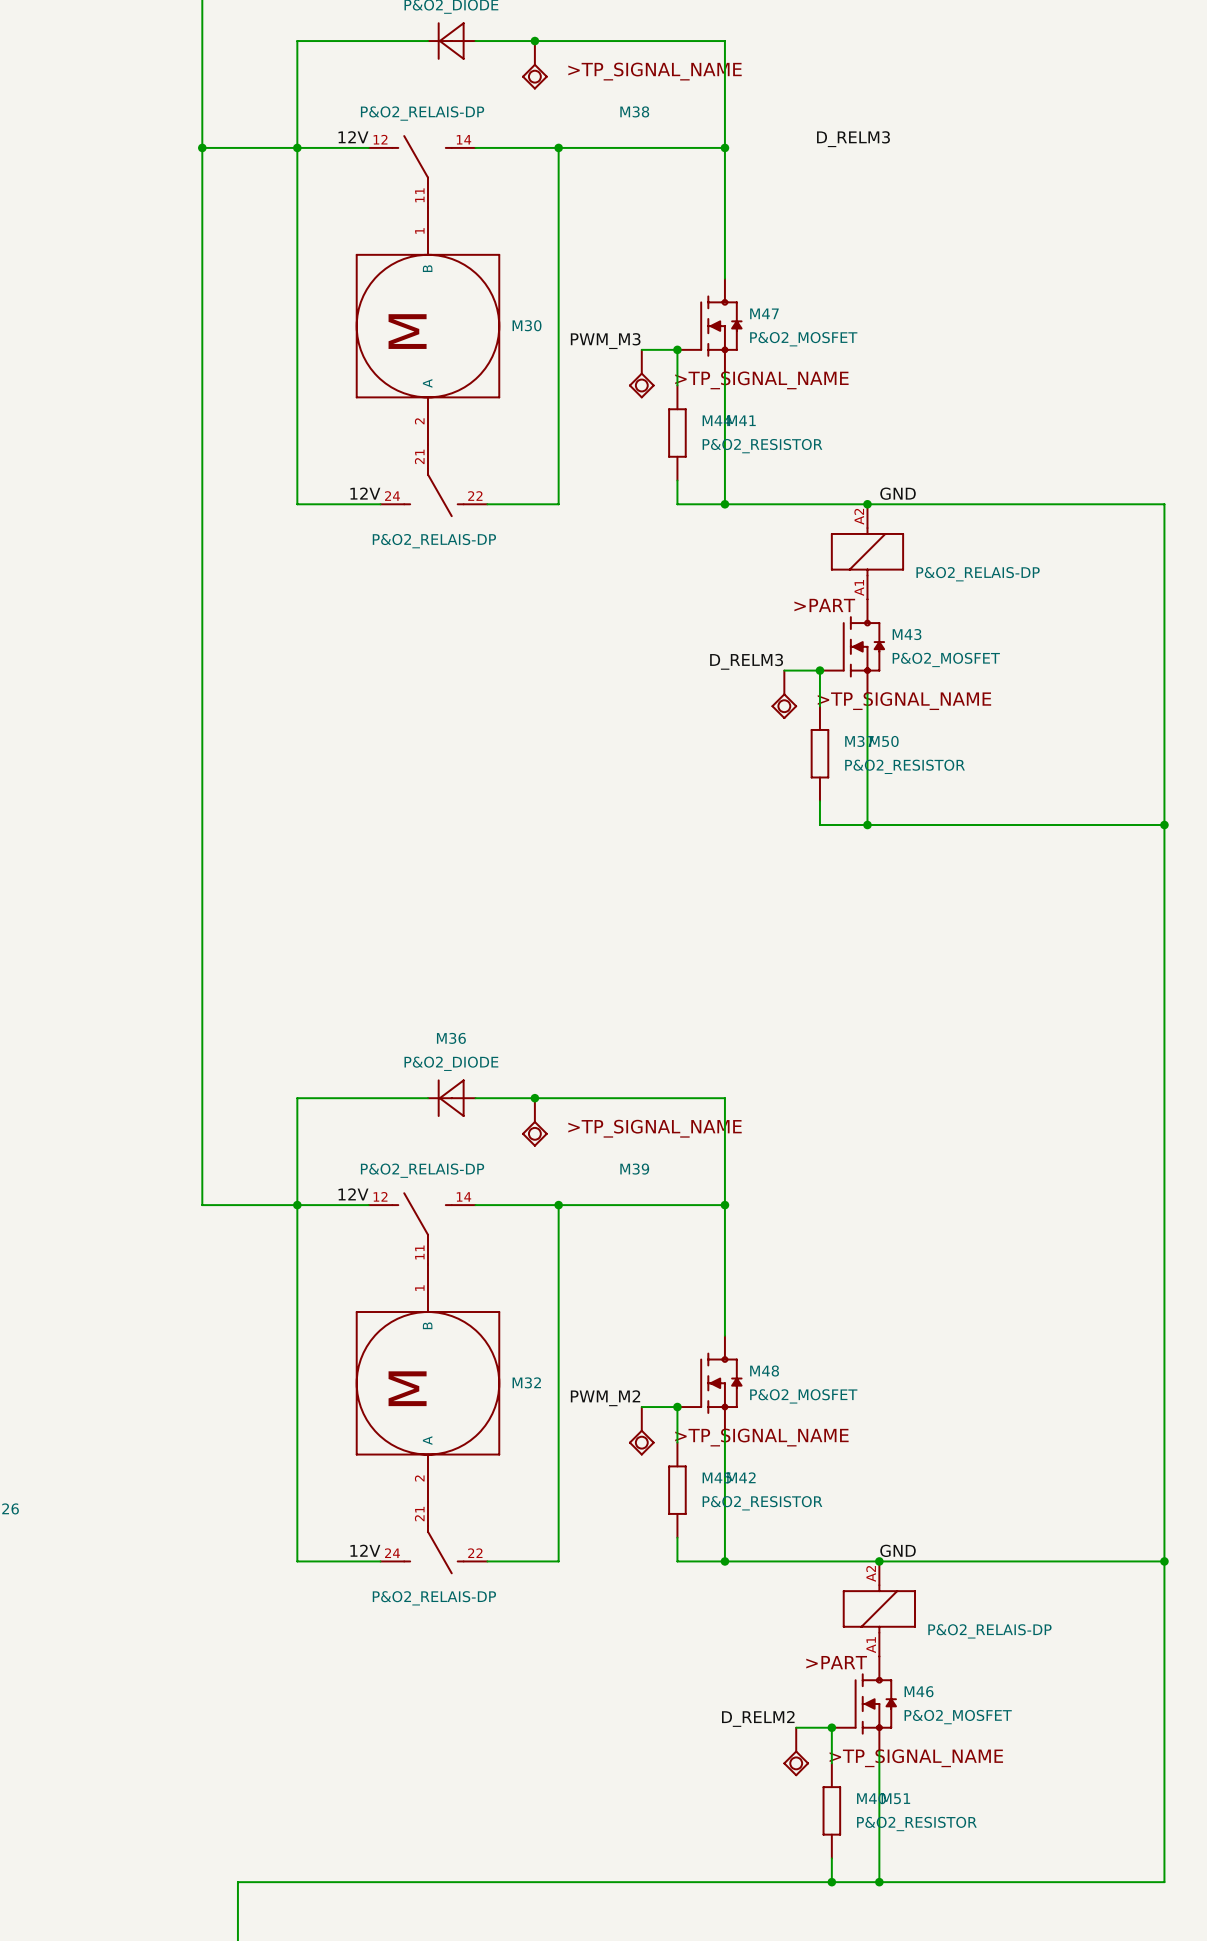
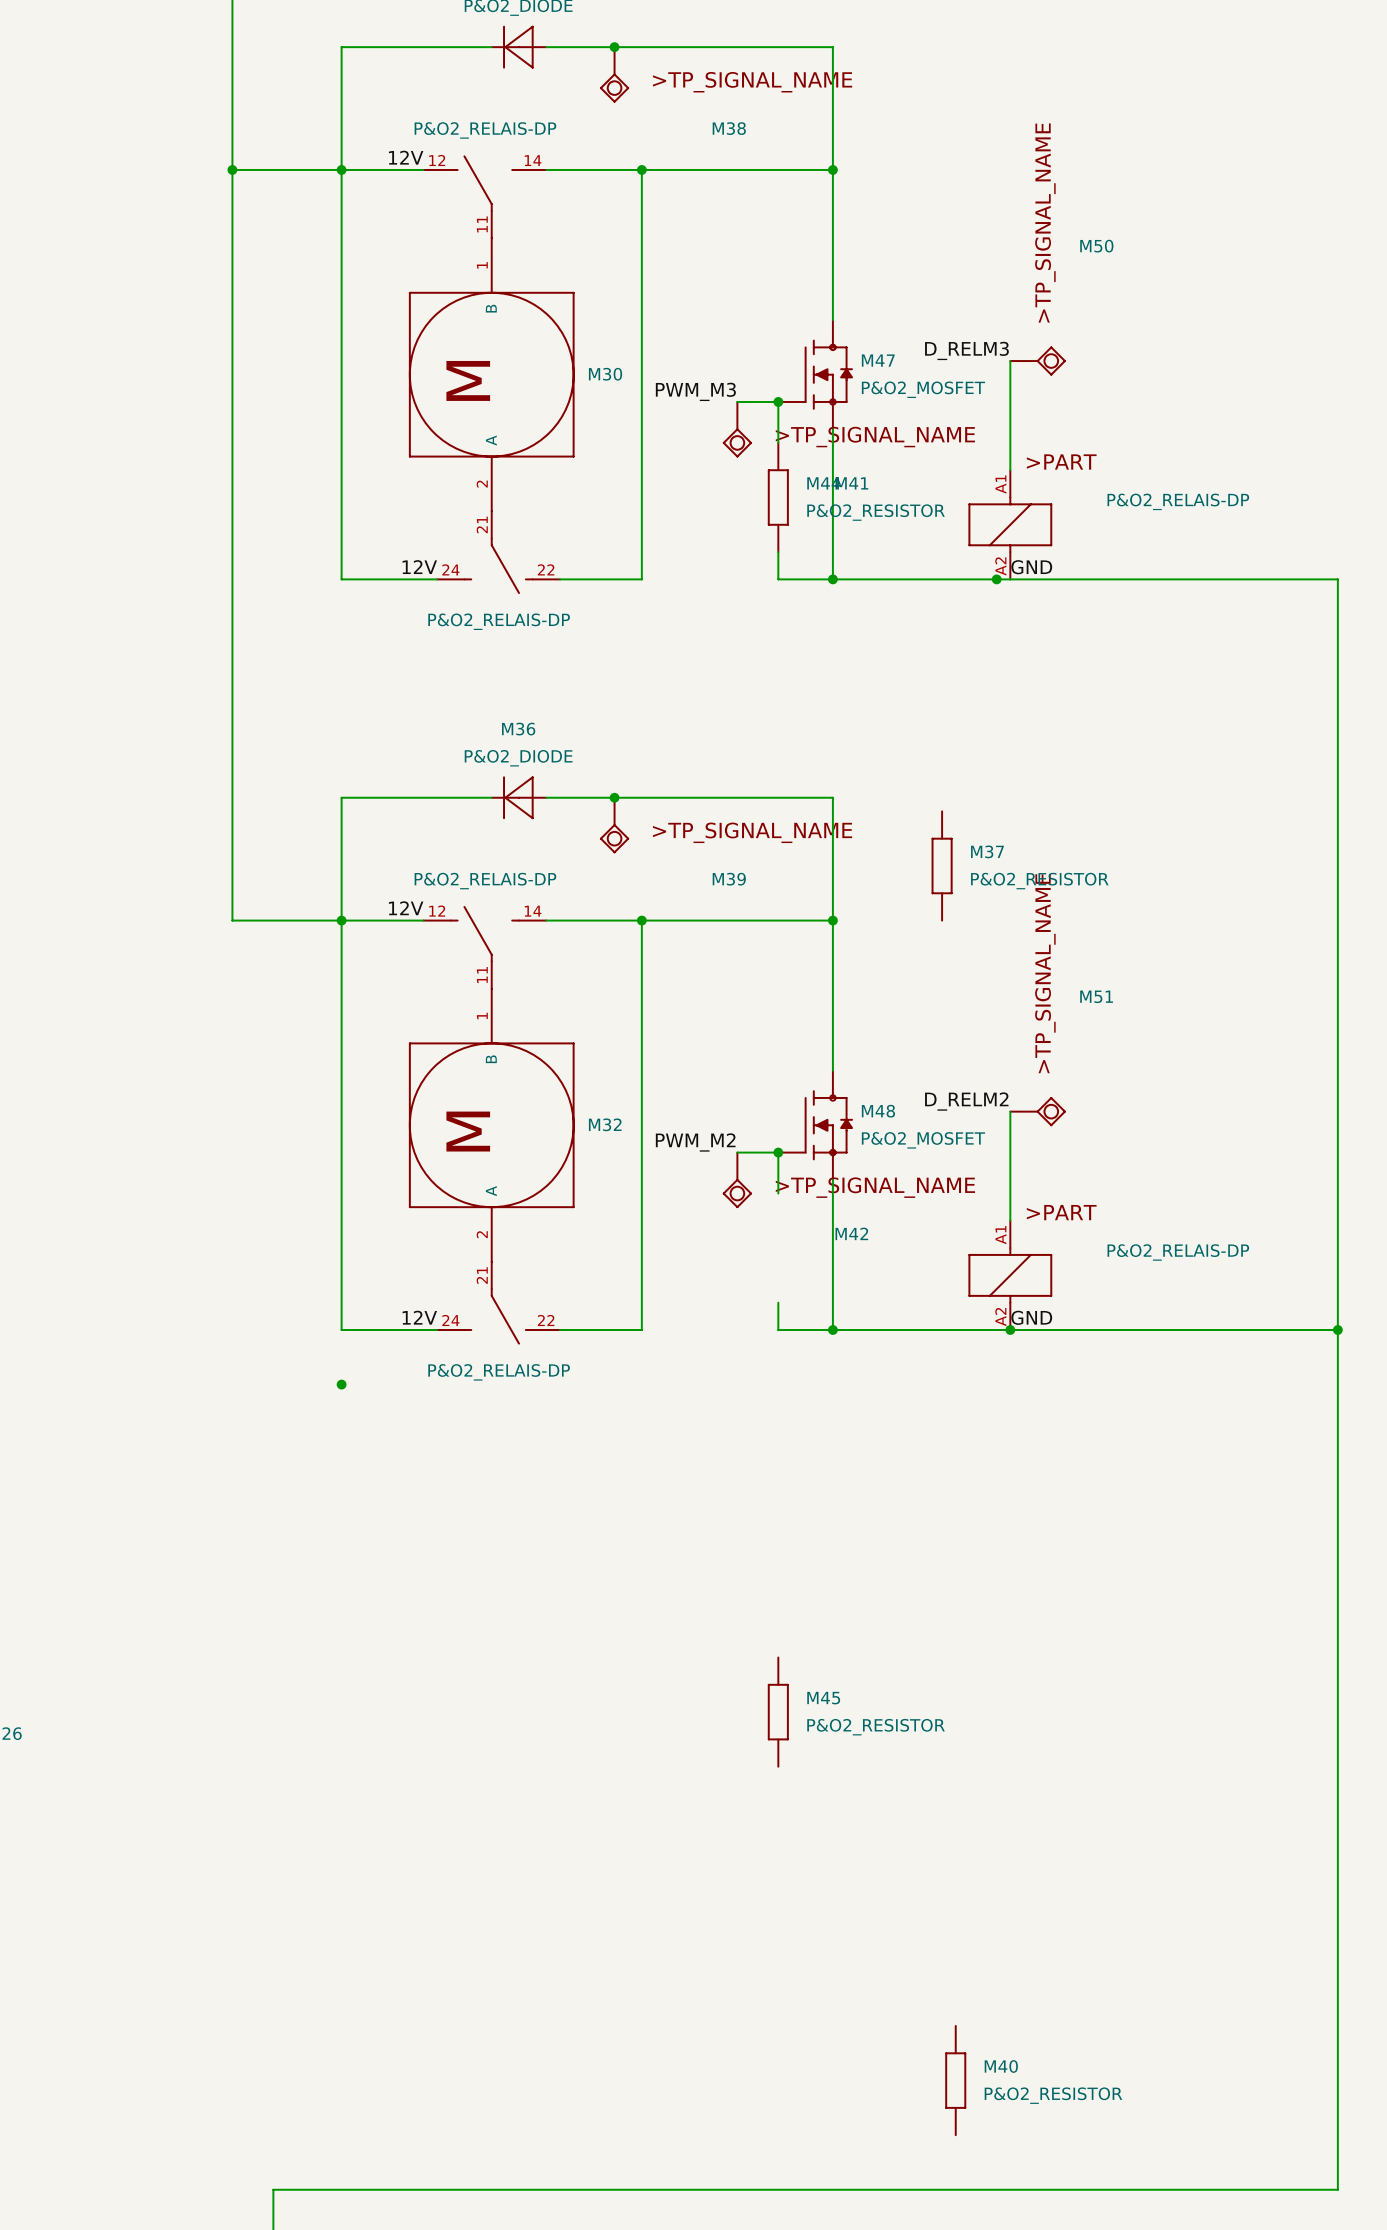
label position: D_RELM3 (853, 139) -> D_RELM3 (966, 350)
wire: none -> (1010, 361) (1010, 470)
part rotation: 0° (867, 551) -> 180° (1010, 524)
part position: (867, 551) -> (1010, 524)
part value position: P&O2_RELAIS-DP (978, 574) -> P&O2_RELAIS-DP (1178, 501)
M43: P&O2_MOSFET (852, 646) -> none
label: D_RELM3 (746, 661) -> none
wire: (784, 670) (819, 670) (819, 706) -> none
junction: (819, 670) -> none
wire: none -> (546, 797) (832, 797) (832, 1070)
junction: none -> (614, 797)
M50 position: (784, 694) -> (1037, 361)
wire: (867, 694) (867, 824) -> none
M50 rotation: 0° (784, 706) -> 90° counterclockwise (1051, 361)
label: none -> 12V (406, 908)
wire: (202, 801) (202, 1205) (368, 1205) -> (232, 920) (423, 920)
junction: none -> (341, 920)
wire: none -> (546, 920) (832, 920)
wire: none -> (641, 920) (641, 1329) (559, 1329)
junction: none -> (641, 920)
junction: none -> (832, 920)
wire: (819, 801) (819, 824) (1164, 824) -> none
part: none -> P&O2_RELAIS-DP (484, 947)
junction: (867, 824) -> none
junction: (1164, 824) -> none
label: none -> D_RELM2 (966, 1101)
wire: none -> (1010, 1111) (1010, 1220)
label: none -> PWM_M2 (695, 1142)
wire: none -> (737, 1152) (778, 1152) (778, 1193)
junction: none -> (778, 1152)
wire: (297, 1098) (427, 1098) -> (341, 1261) (341, 797) (491, 797)
M36 position: (451, 1098) -> (519, 797)
wire: (475, 1098) (724, 1098) -> (832, 1179) (832, 1261)
junction: (534, 1098) -> none
part: none -> P&O2_RELAIS-DP (1010, 1275)
M39 position: (534, 1121) -> (614, 825)
part: none -> P&O2_RELAIS-DP (498, 1302)
wire: none -> (778, 1302) (778, 1329) (1337, 1329)
label: none -> GND (1031, 1317)
wire: (297, 1157) (297, 1561) (380, 1561) -> (341, 1329) (437, 1329)
wire: (724, 1157) (724, 1335) -> none
junction: none -> (1010, 1329)
junction: none -> (1337, 1329)
label position: 12V (353, 1194) -> 12V (419, 1317)
wire: (475, 1205) (724, 1205) -> none
wire: (558, 1205) (558, 1561) (487, 1561) -> none
junction: (558, 1205) -> none
junction position: (724, 1205) -> (832, 1329)
part: P&O2_RELAIS-DP (422, 1228) -> none
M32 position: (427, 1383) -> (491, 1125)
M48 position: (709, 1383) -> (815, 1125)
label: PWM_M2 (605, 1398) -> none
wire: (641, 1407) (677, 1407) (677, 1442) -> none
junction: (677, 1407) -> none
M42 position: (641, 1430) -> (737, 1179)
wire: (724, 1430) (724, 1561) -> none
part: P&O2_RELAIS-DP (433, 1537) -> none
wire: (677, 1537) (677, 1561) (1164, 1561) -> none
label: 12V (365, 1550) -> none
label: GND (898, 1550) -> none
junction: (724, 1561) -> none
junction: (879, 1561) -> none
junction: (1164, 1561) -> none
part: P&O2_RELAIS-DP (879, 1608) -> none
M46: P&O2_MOSFET (863, 1703) -> none
label: D_RELM2 (758, 1718) -> none
wire: (796, 1727) (831, 1727) (831, 1763) -> none
junction: (831, 1727) -> none
M51 position: (796, 1751) -> (1037, 1111)
wire: (879, 1751) (879, 1882) -> none
M51 rotation: 0° (796, 1763) -> 90° counterclockwise (1051, 1111)
wire: (831, 1858) (831, 1882) -> none
junction: (831, 1882) -> none
junction: (879, 1882) -> none
wire: (1164, 1882) (237, 1882) (237, 1905) -> (1337, 2162) (1337, 2189) (273, 2189)

